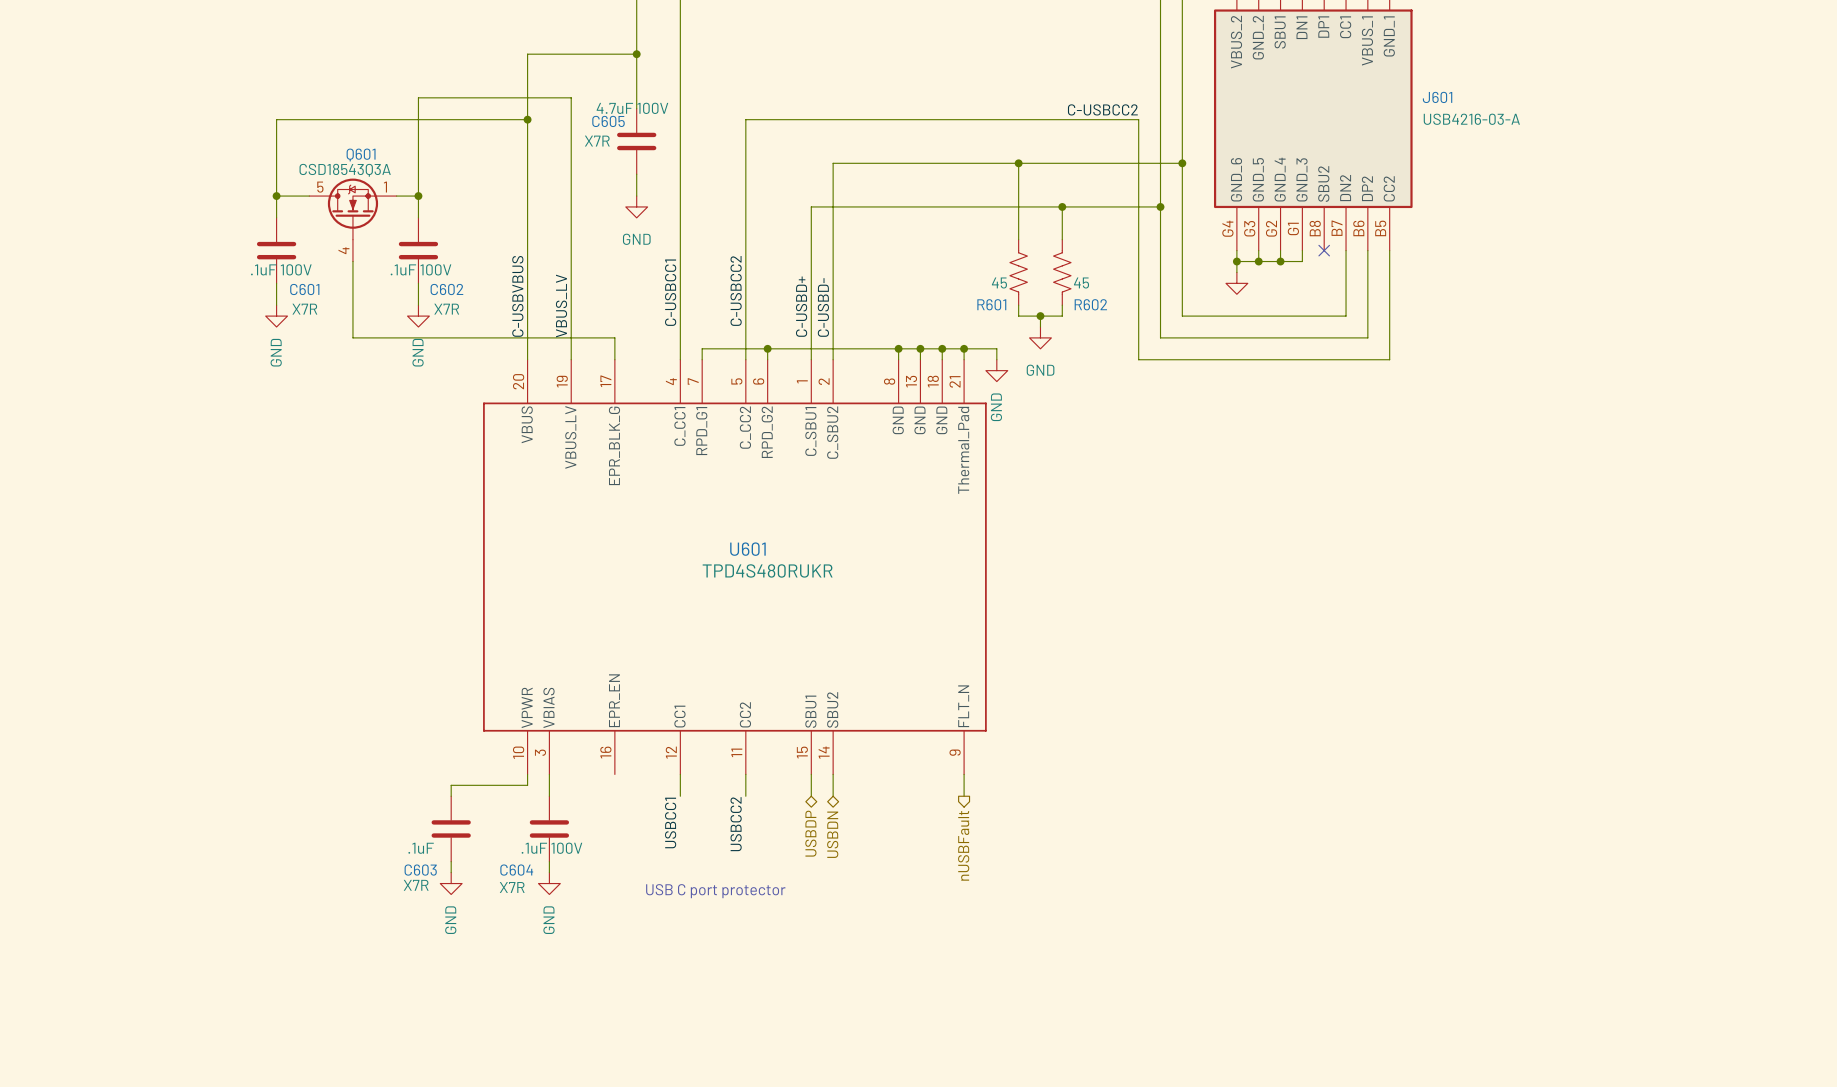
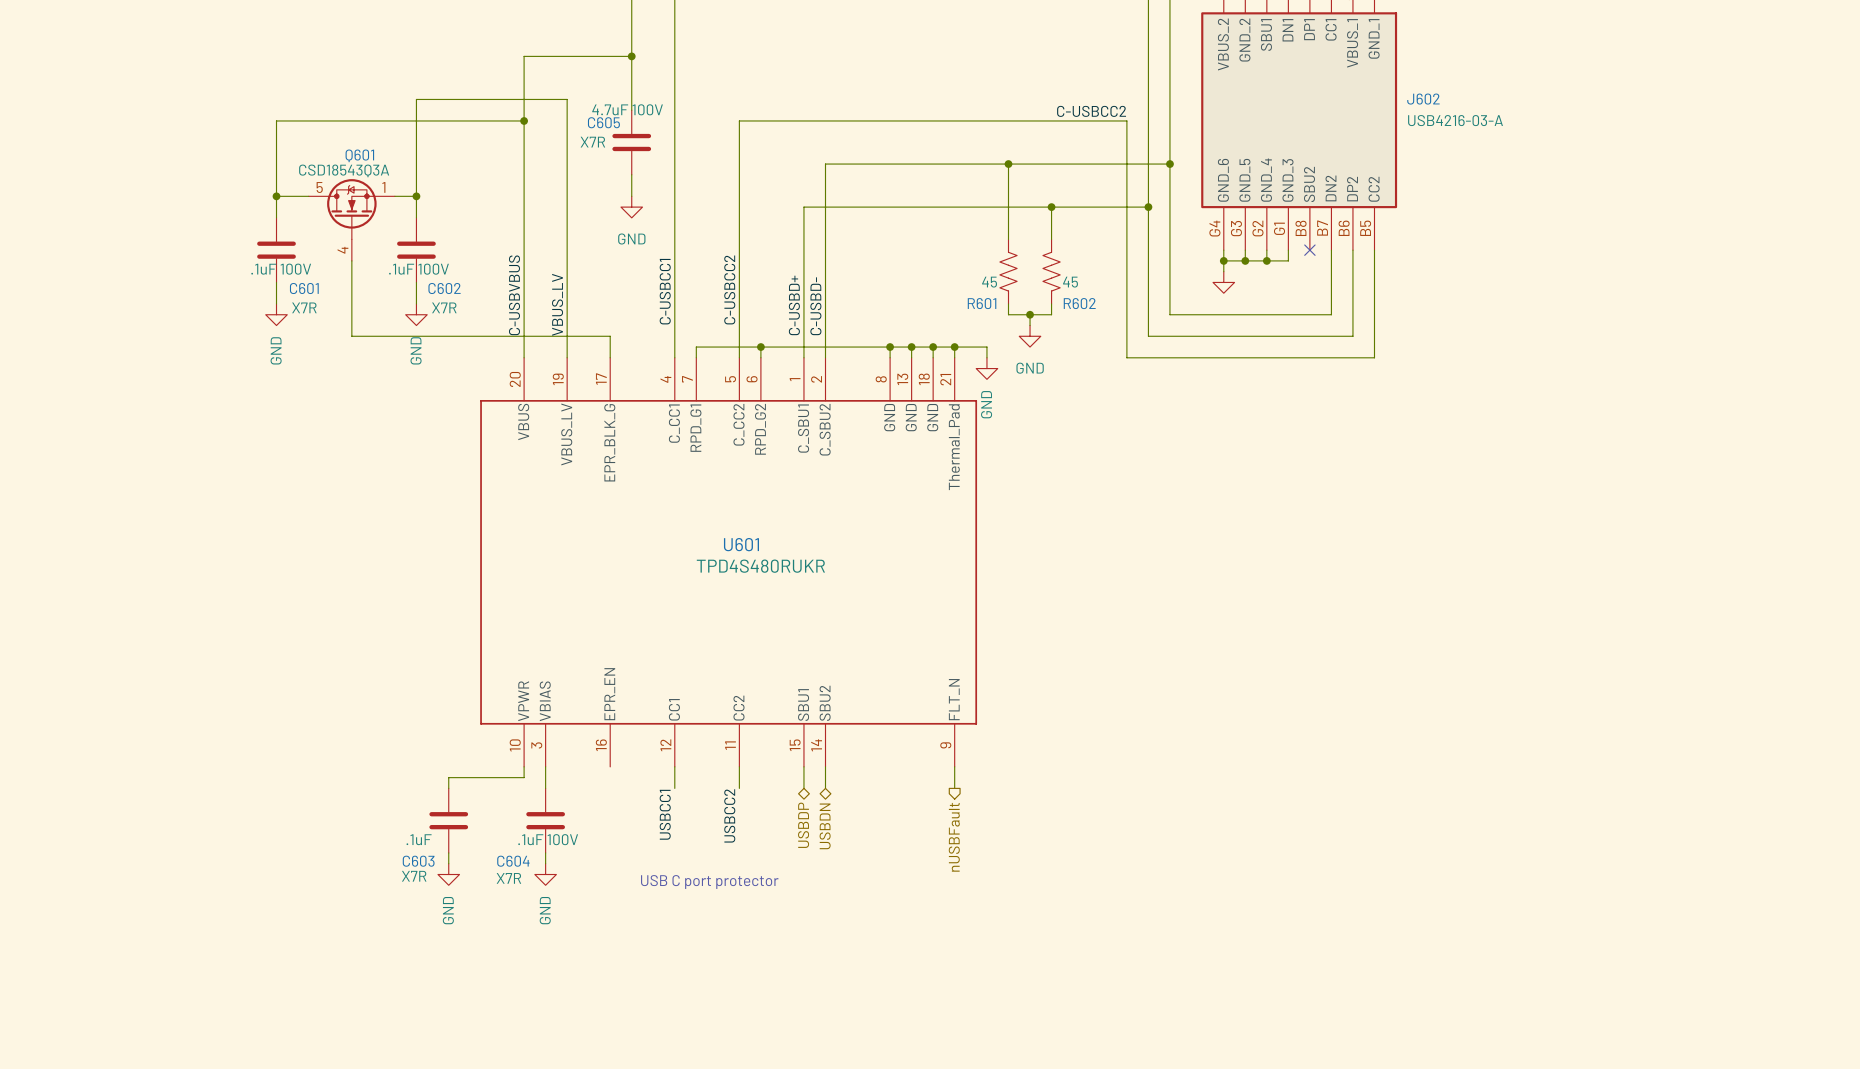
J601 name: J601 (1437, 97) -> J602 (1423, 99)

